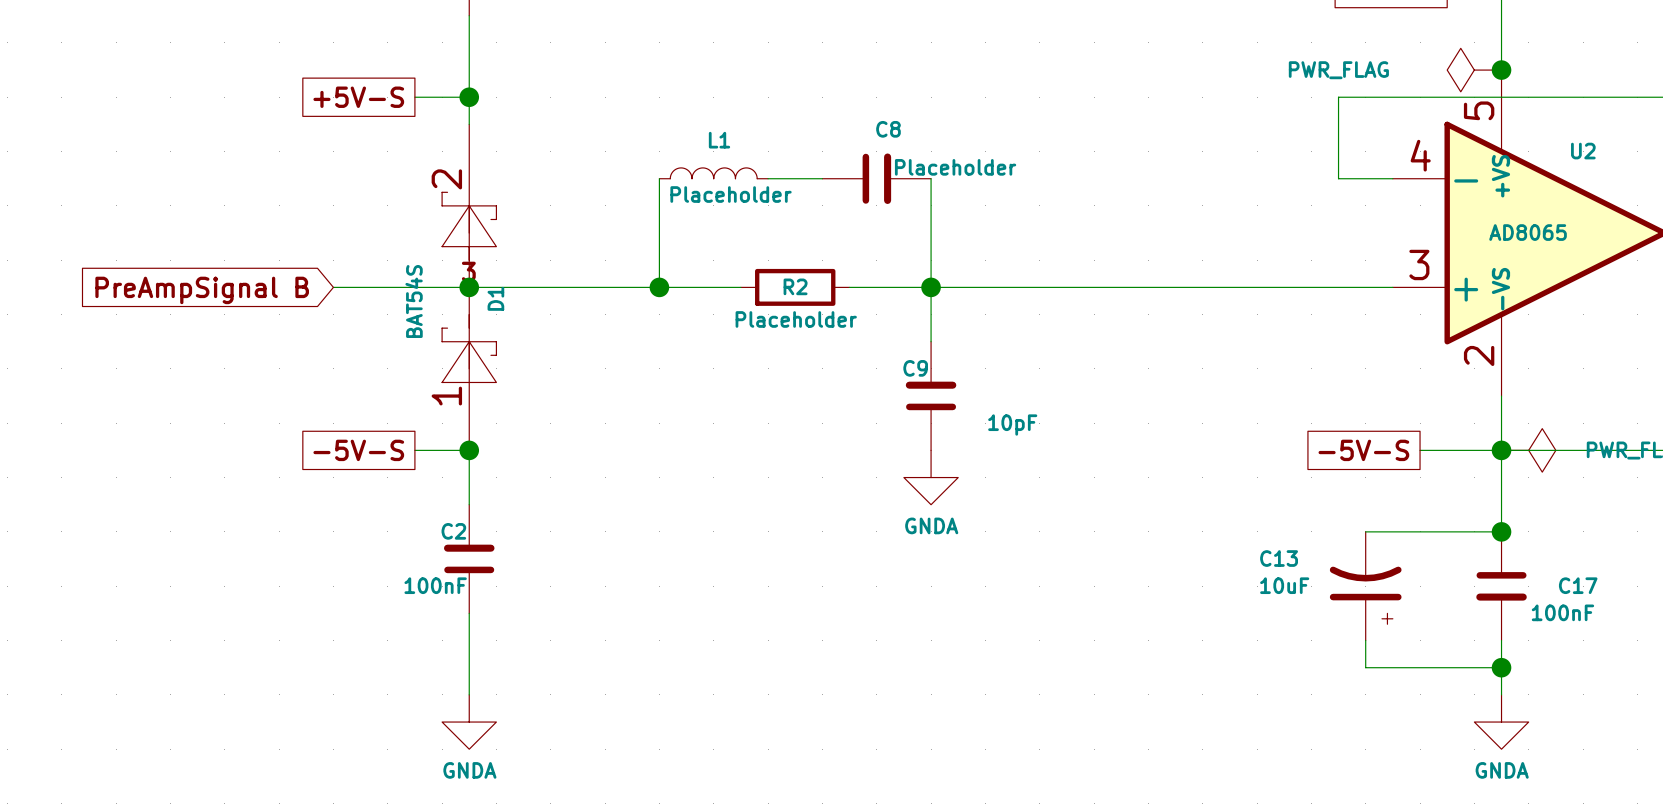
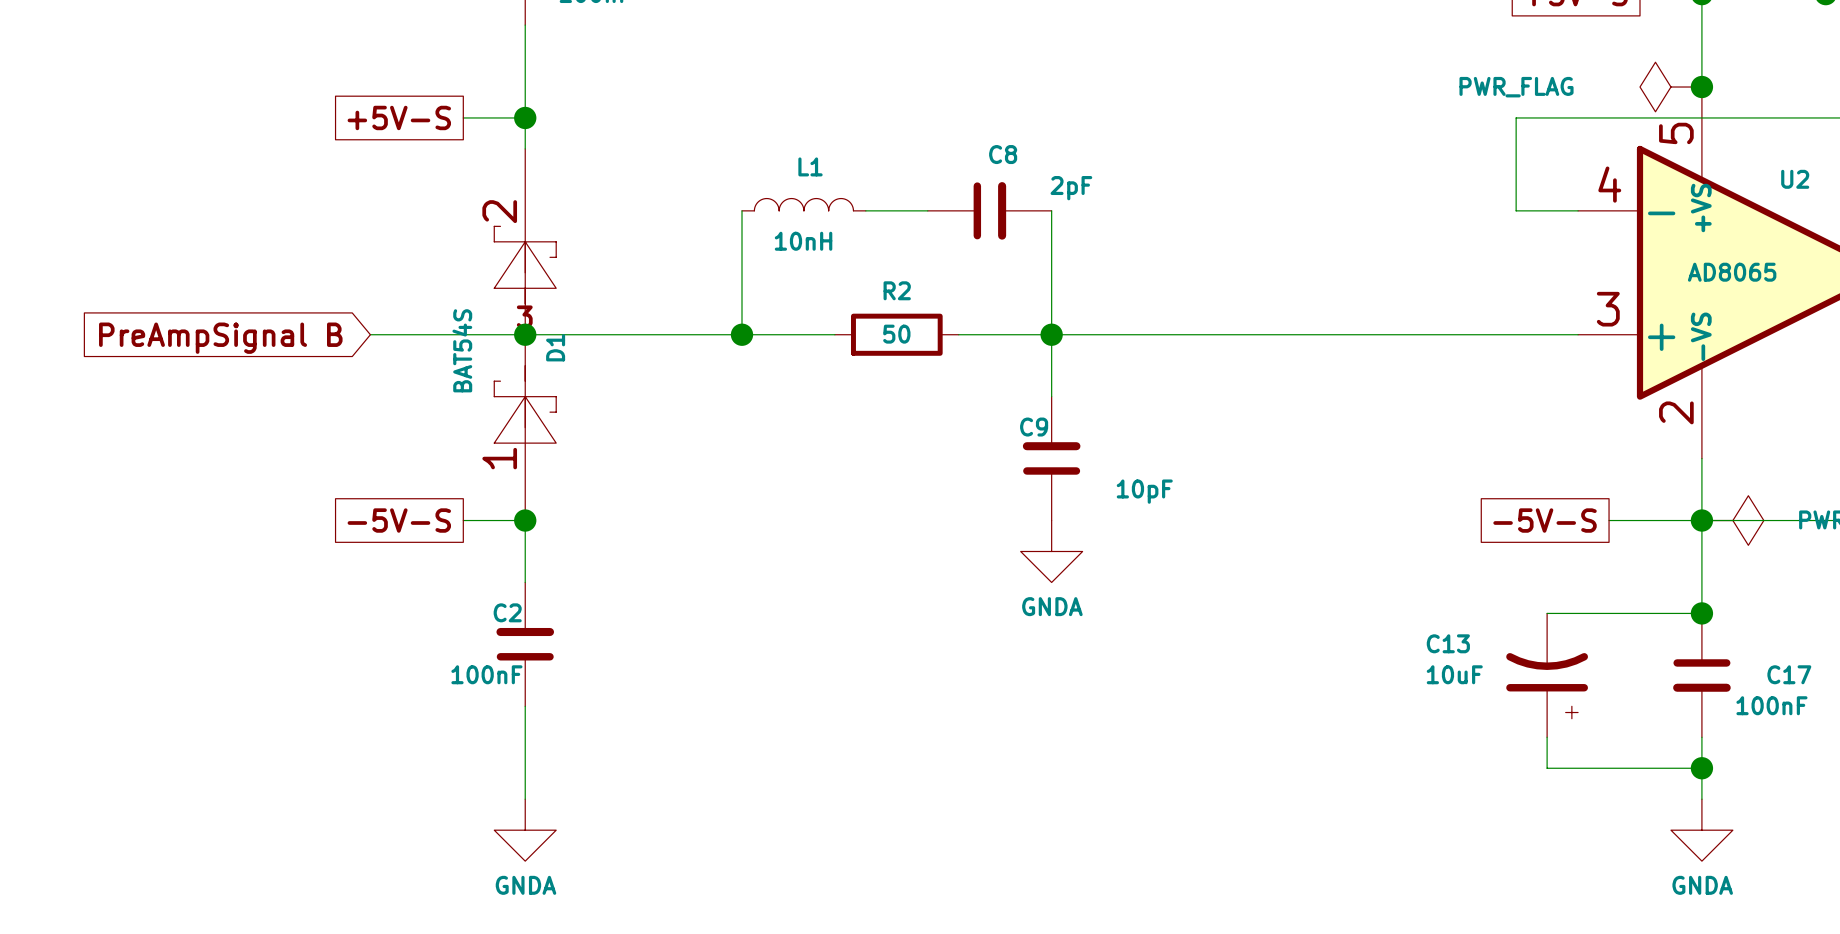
C8 value: Placeholder (955, 167) -> 2pF (1071, 188)
L1 value: Placeholder (731, 194) -> 10nH (803, 241)
R2 name position: R2 (795, 286) -> R2 (897, 290)
R2 value: Placeholder (796, 319) -> 50 (896, 334)

